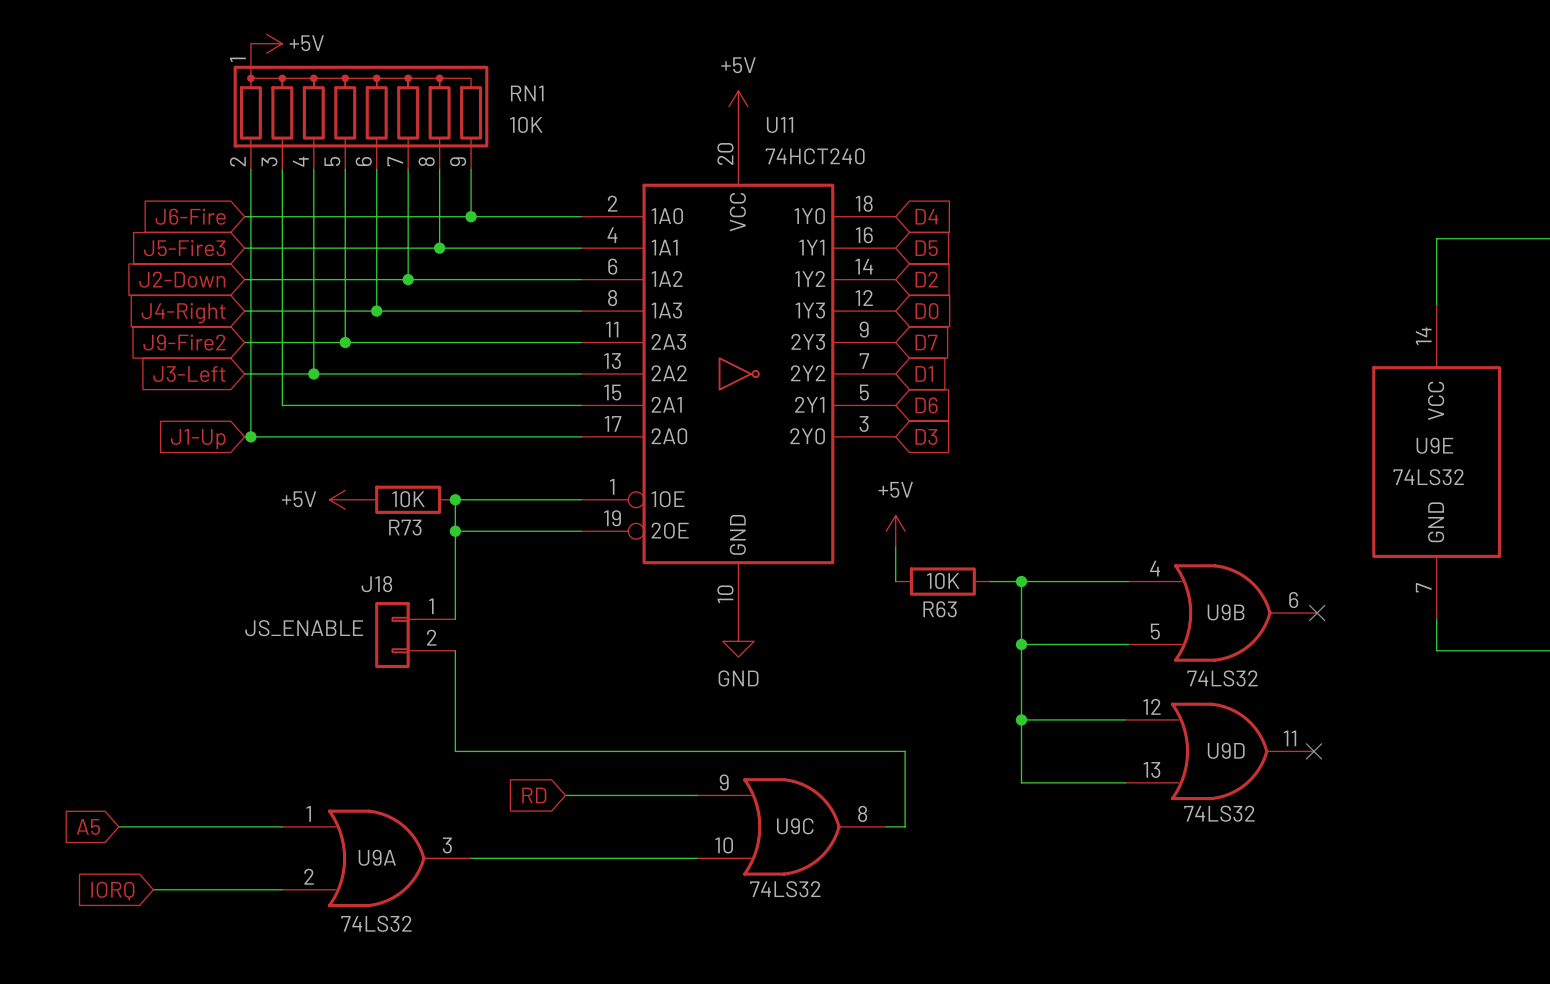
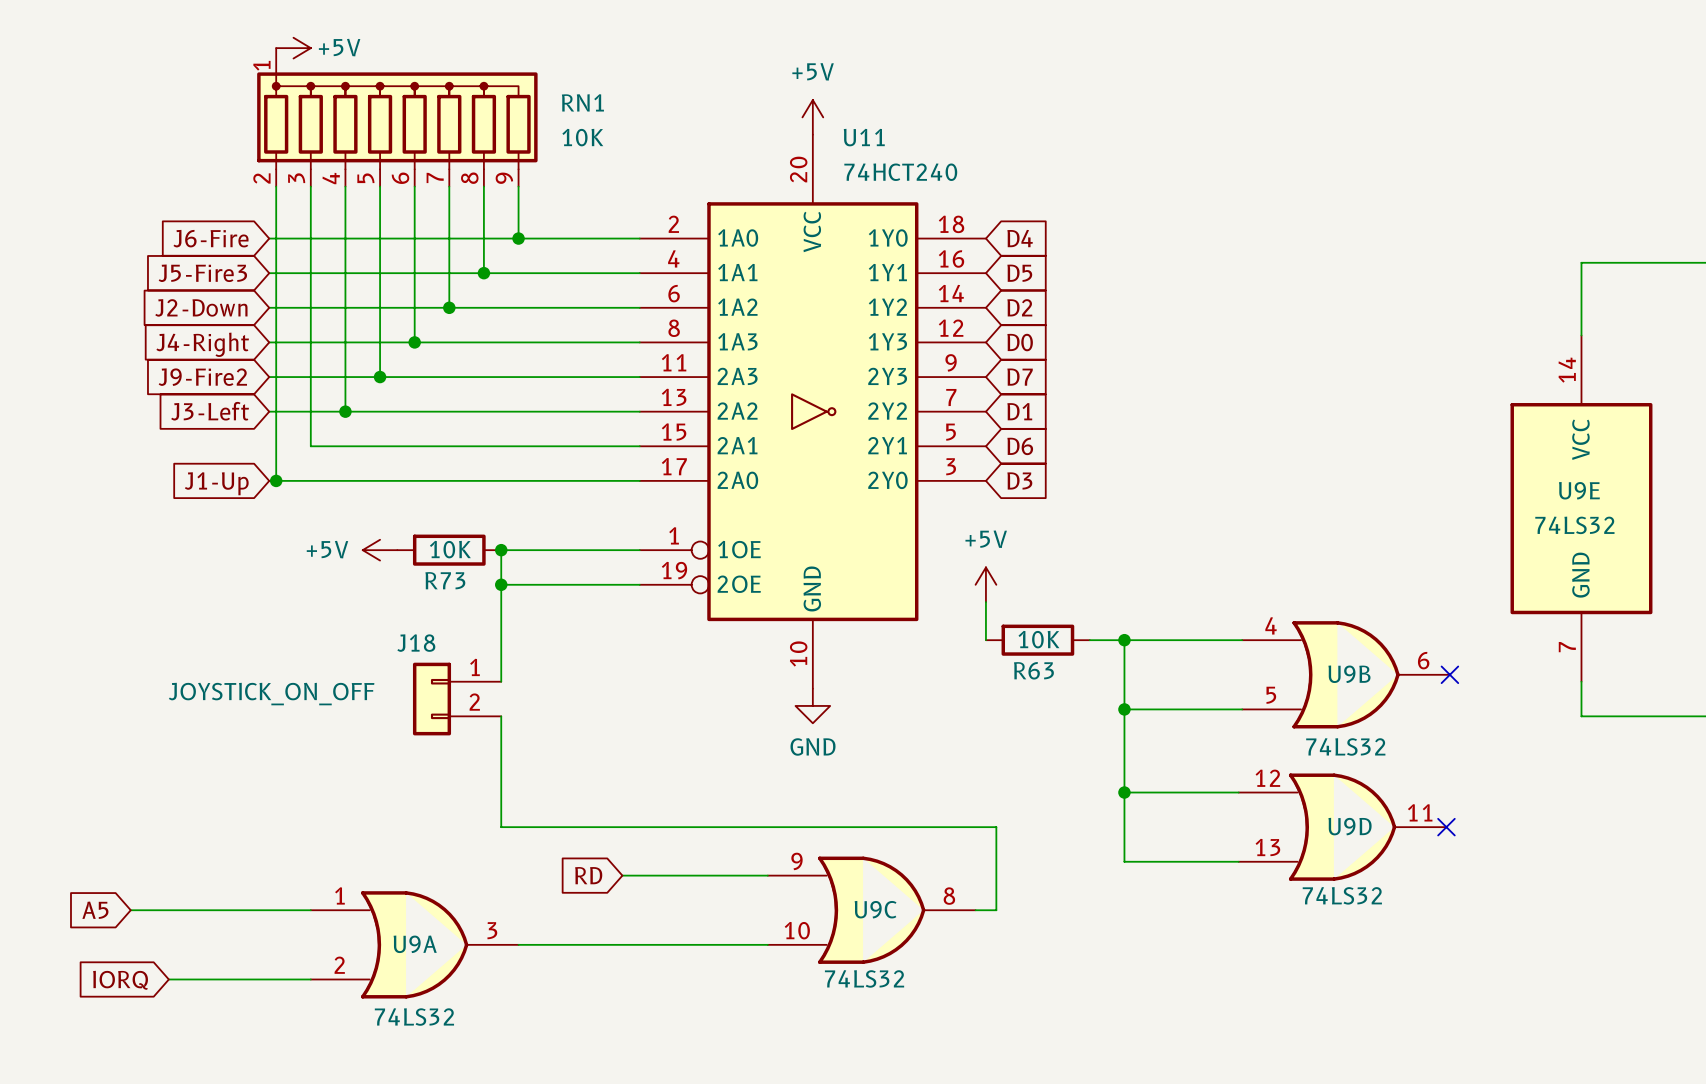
J18 value: JS_ENABLE (304, 628) -> JOYSTICK_ON_OFF (271, 694)

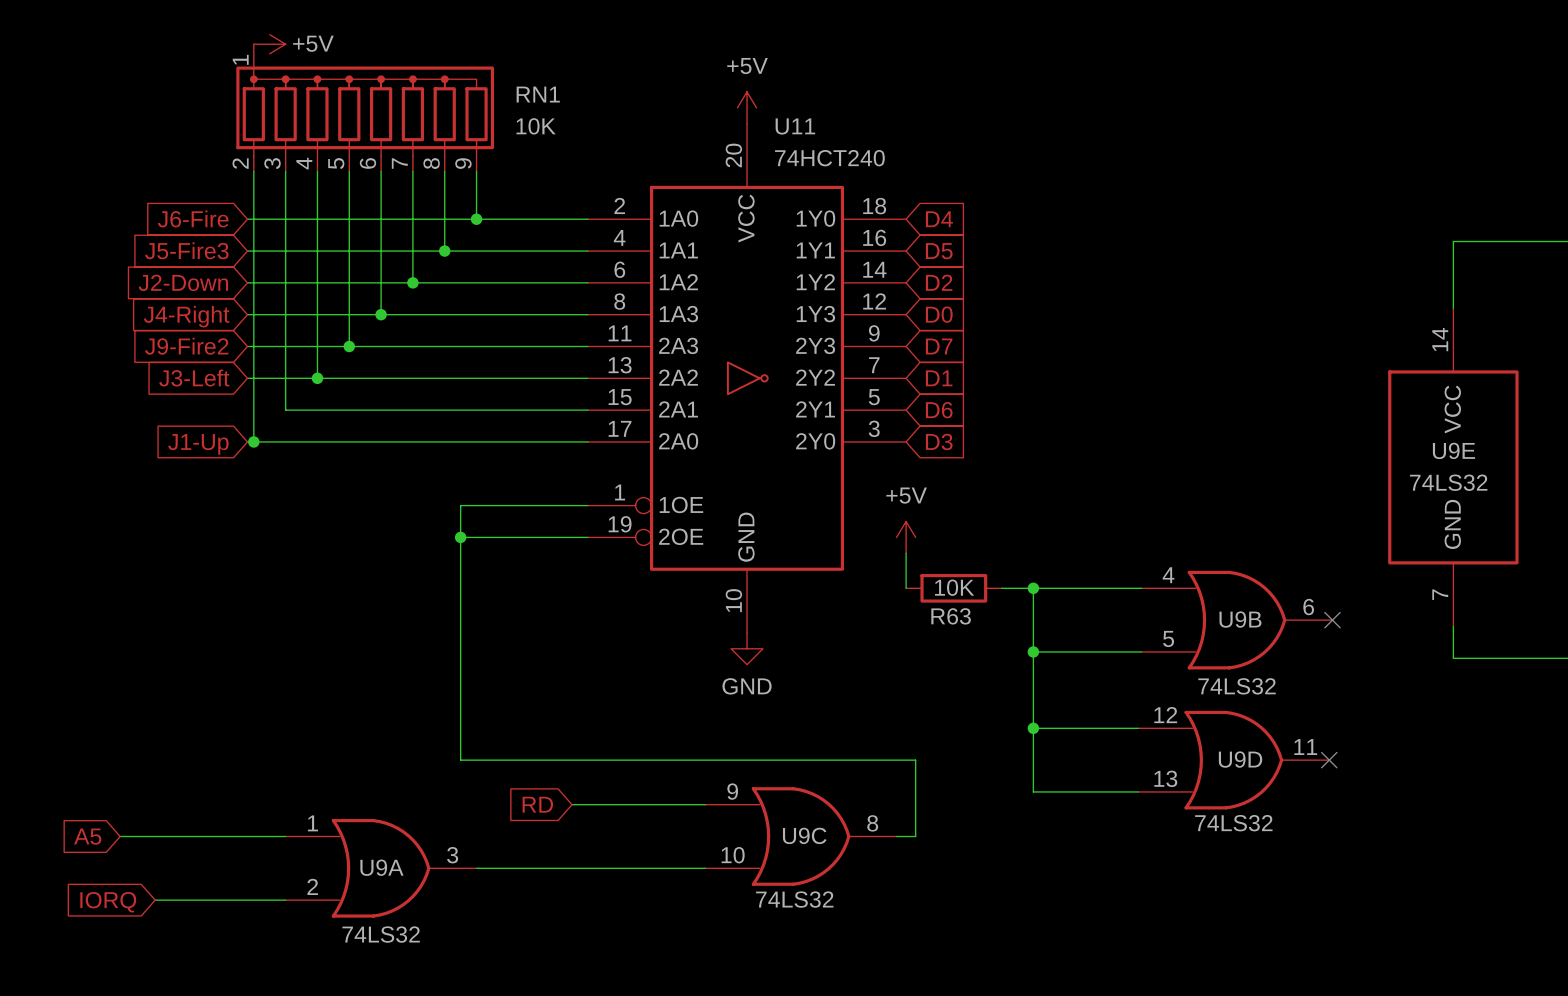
power symbol: +5V (380, 550) -> none
R73: 10K (449, 550) -> none
junction: (501, 550) -> none
wire: none -> (460, 626) (460, 658)
J18: JOYSTICK_ON_OFF (457, 699) -> none

